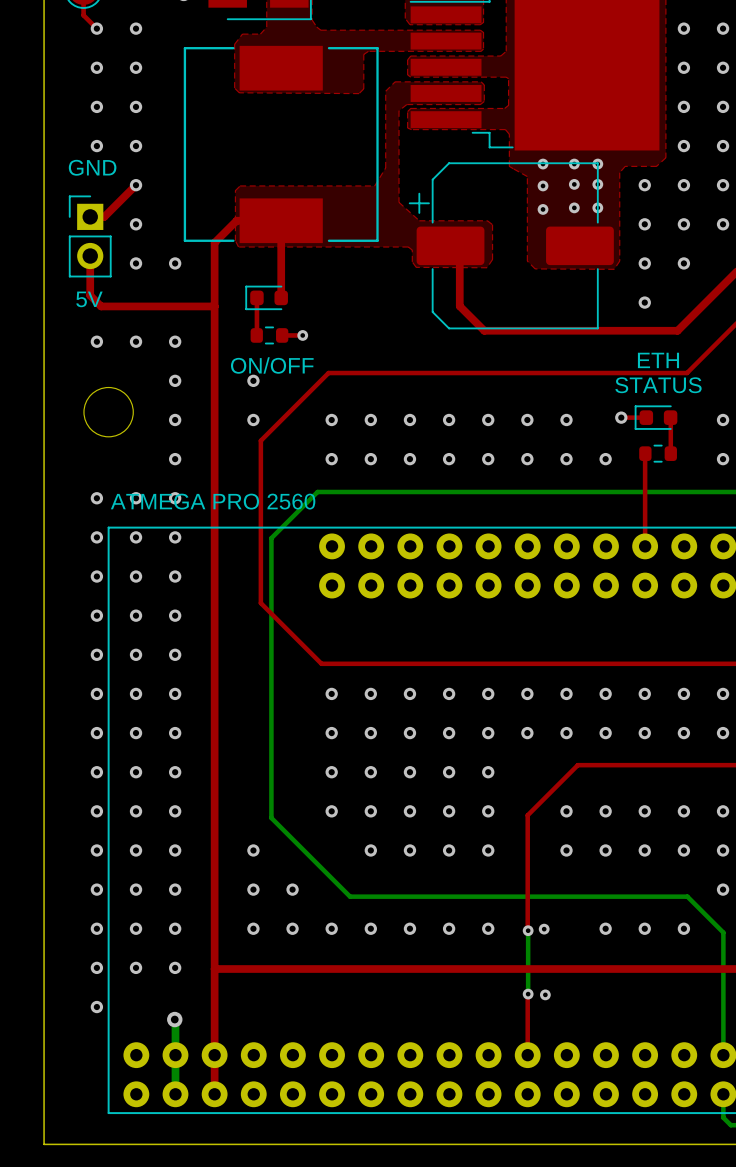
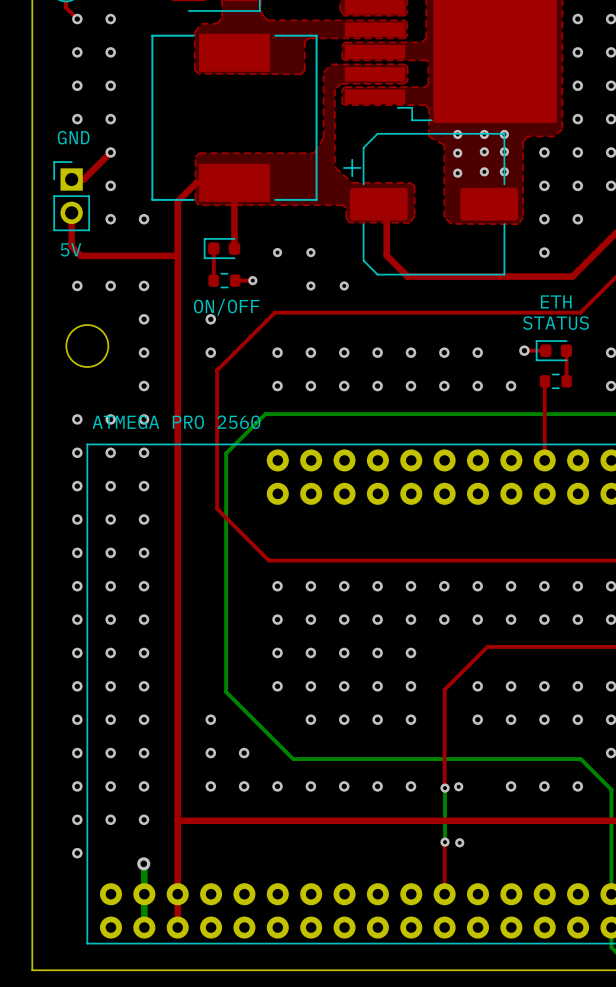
via: none -> (277, 252)
via: none -> (310, 252)
via: none -> (310, 285)
via: none -> (344, 285)

